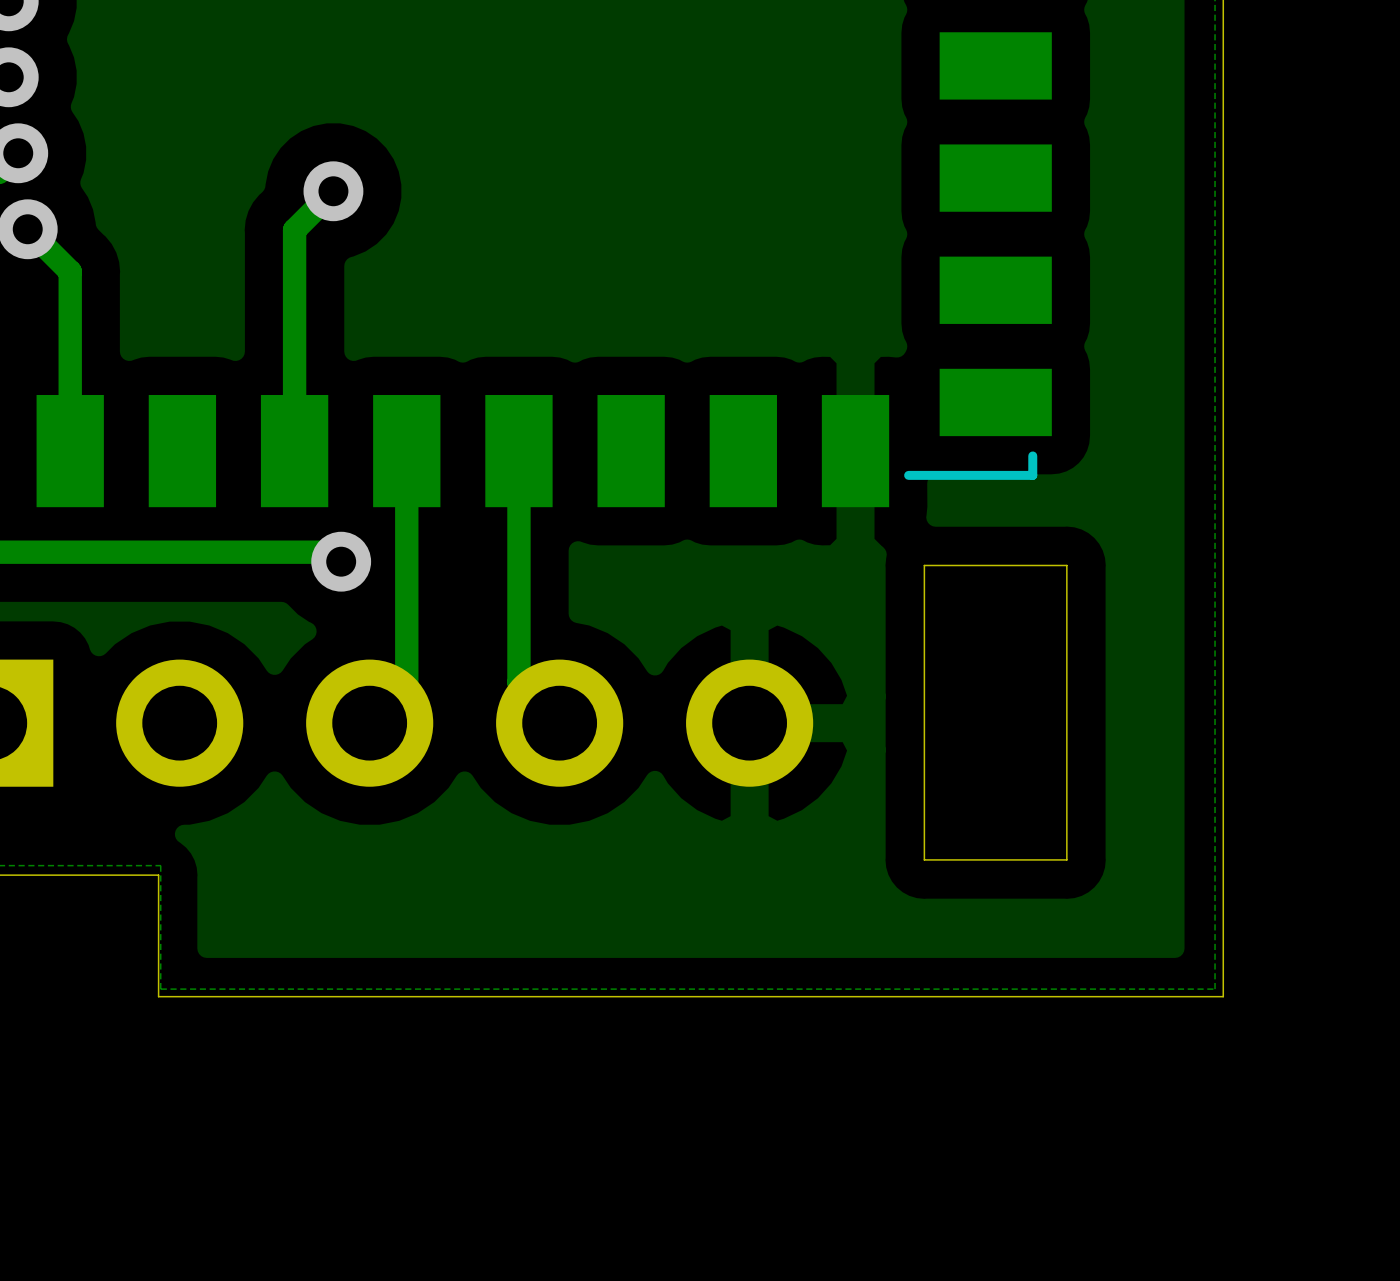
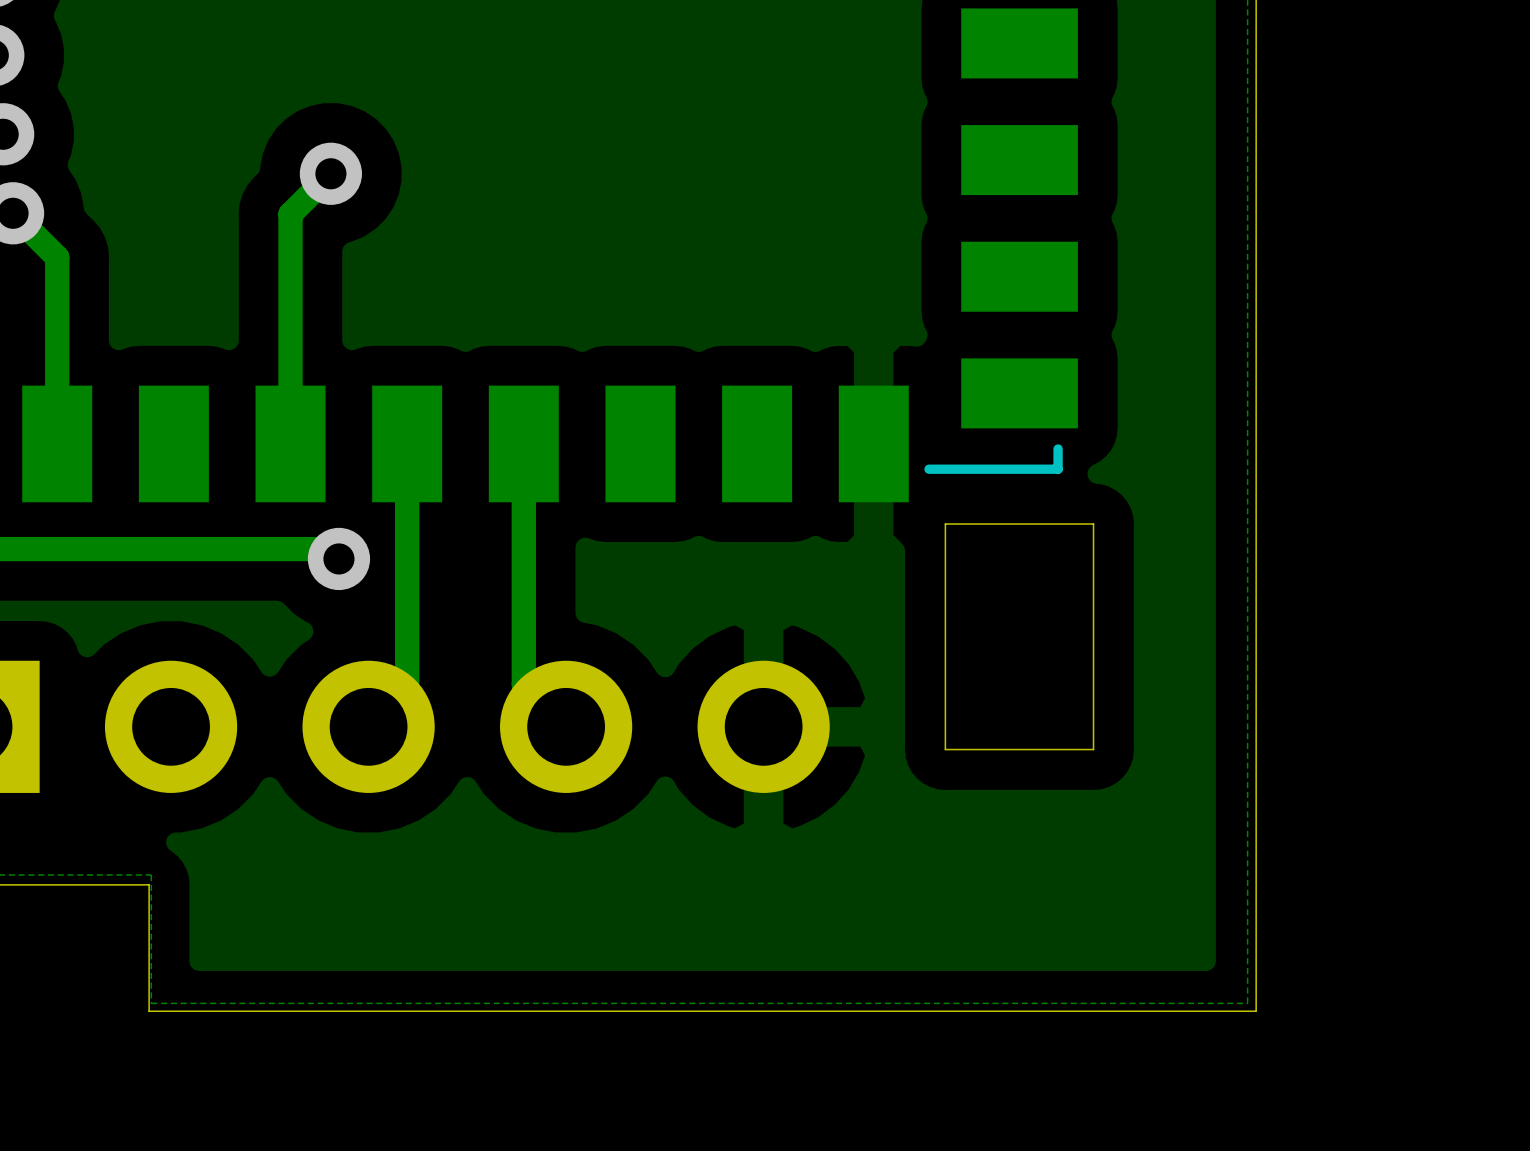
board edge: (1066, 565) (924, 565) -> (1093, 562) (1093, 524) (945, 524) (945, 562)
board edge: (1066, 744) (1066, 859) (924, 859) (924, 744) -> (1093, 749) (945, 749)

